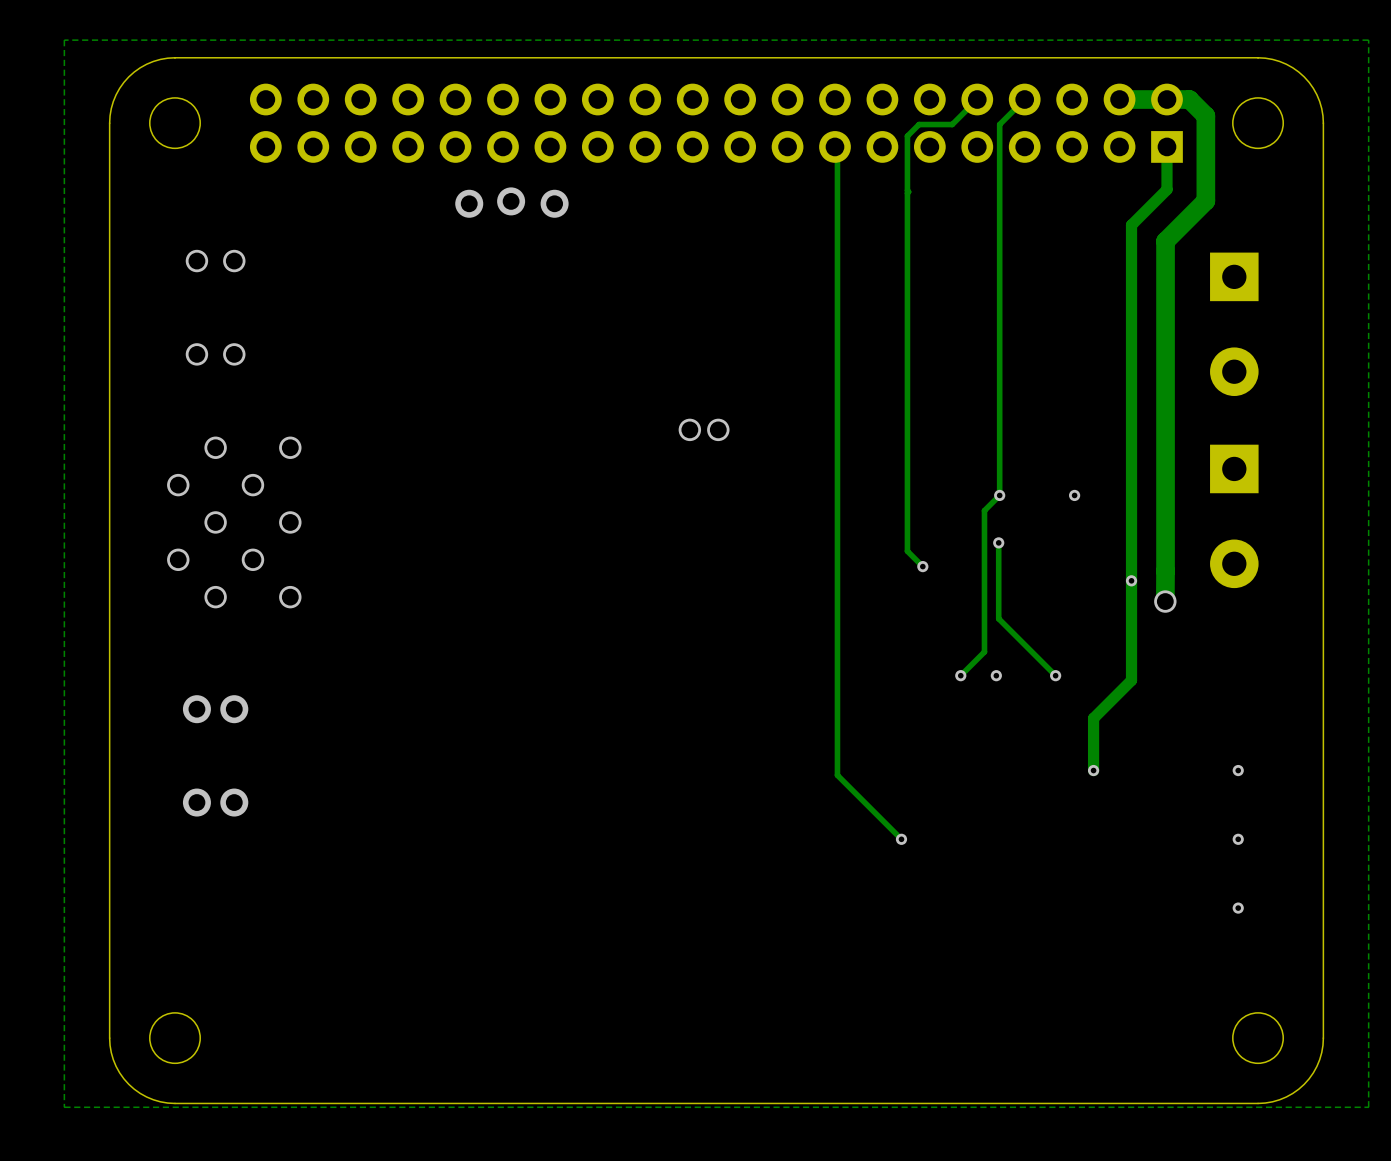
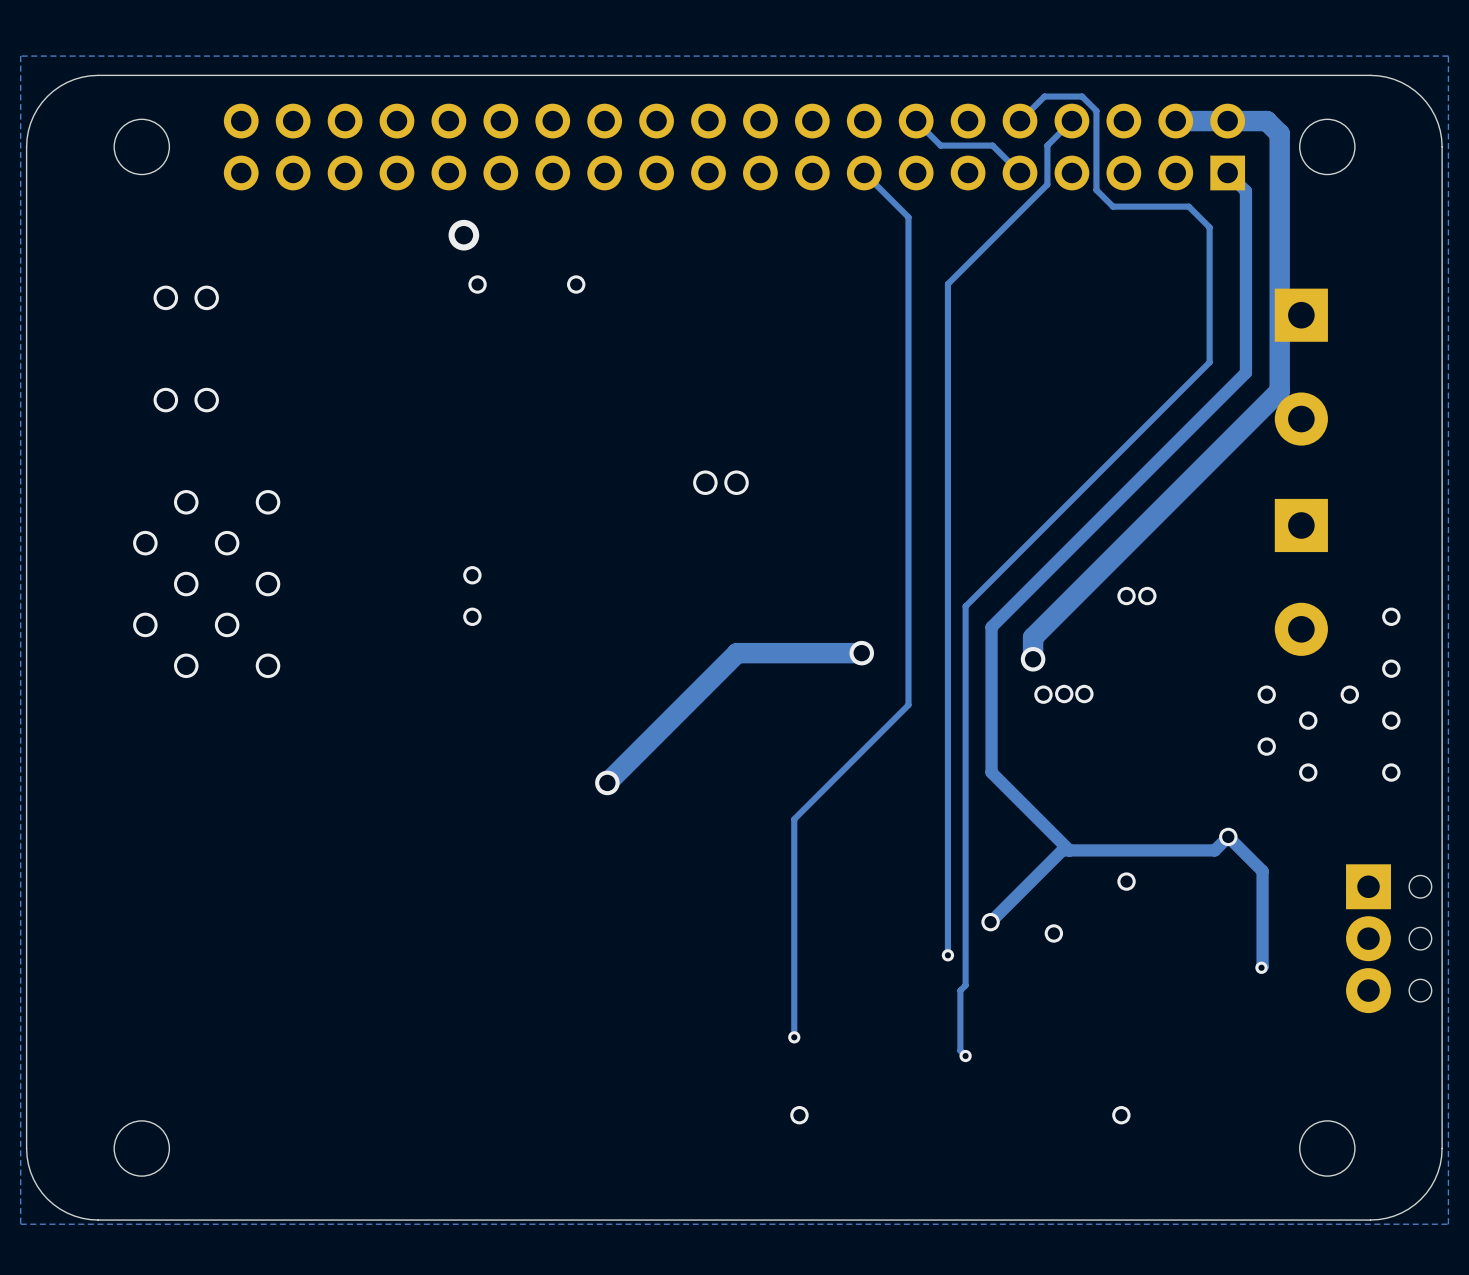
track: none -> (916, 121) (940, 145) (992, 145) (1020, 172)
track: (977, 99) (952, 124) (919, 124) (907, 136) (907, 551) (922, 566) -> (1020, 121) (1044, 96) (1082, 96) (1096, 110) (1096, 190) (1113, 206) (1188, 206) (1209, 227) (1209, 362) (965, 606) (965, 985) (960, 990) (960, 1050) (965, 1056)
track: (1189, 99) (1205, 115) (1205, 200) (1165, 241) (1165, 601) -> (1252, 121) (1266, 121) (1279, 133) (1279, 390) (1033, 637) (1033, 659)
track: (1002, 121) (999, 124) (999, 495) (984, 510) (984, 651) (960, 675) -> (1047, 145) (1047, 184) (947, 284) (947, 955)
board edge: (1323, 123) (1321, 108) (1316, 94) (1304, 76) (1286, 64) (1272, 59) (1258, 57) (175, 57) (153, 61) (134, 72) (123, 82) (116, 94) (111, 108) (109, 123) (109, 1038) (111, 1052) (116, 1066) (128, 1084) (146, 1096) (160, 1101) (175, 1103) -> (1327, 1220) (1378, 1219) (1394, 1216) (1408, 1209) (1421, 1199) (1431, 1186) (1438, 1172) (1441, 1156) (1442, 146) (1440, 131) (1435, 115) (1421, 96) (1401, 82) (1386, 77) (1370, 75) (98, 75) (74, 79) (60, 86) (47, 96) (33, 115) (27, 138) (26, 1148) (30, 1172) (37, 1186) (47, 1199) (60, 1209) (74, 1216) (90, 1219) (141, 1220)
board edge: (1323, 123) (1322, 1045) (1316, 1066) (1309, 1078) (1298, 1089) (1279, 1099) (1258, 1103) -> none
track: (1166, 146) (1166, 189) (1131, 225) (1131, 680) (1093, 718) (1093, 770) -> (1227, 172) (1245, 191) (1245, 372) (991, 627) (991, 772) (1069, 850)
track: (837, 149) (837, 775) (901, 839) (899, 839) -> (866, 175) (908, 217) (908, 705) (794, 819) (794, 1037)
via: (511, 201) -> none
via: (554, 203) -> none
via: none -> (477, 284)
via: none -> (576, 284)
via: (999, 495) -> none
via: (1074, 495) -> none
via: none -> (472, 575)
via: none -> (1126, 596)
via: none -> (1147, 596)
track: (998, 542) (998, 618) (1055, 675) -> none
via: (998, 542) -> none
via: none -> (472, 616)
via: none -> (1391, 616)
via: (922, 566) -> none
via: (1131, 580) -> none
track: none -> (861, 653) (737, 653) (607, 782)
via: none -> (861, 653)
via: none -> (1033, 659)
via: none -> (1391, 668)
via: (1165, 601) -> none
via: none -> (1064, 694)
via: none -> (1084, 694)
via: none -> (1043, 694)
via: none -> (1266, 694)
via: none -> (1349, 694)
via: none -> (1308, 720)
via: none -> (1391, 720)
via: none -> (1266, 746)
via: (960, 675) -> none
via: (996, 675) -> none
via: (1055, 675) -> none
via: none -> (1308, 772)
via: none -> (1391, 772)
via: none -> (607, 782)
via: (196, 709) -> none
via: (234, 709) -> none
via: none -> (1228, 836)
via: (1093, 770) -> none
via: (1238, 770) -> none
via: none -> (1126, 881)
via: (196, 802) -> none
via: (234, 802) -> none
track: none -> (990, 922) (1062, 850) (1214, 850) (1228, 836) (1262, 871) (1261, 967)
via: none -> (990, 922)
via position: (901, 839) -> (947, 955)
via: (1238, 839) -> none
via: none -> (1053, 933)
part: none -> (1388, 938)
via: none -> (1261, 967)
via: (1238, 908) -> none
via: none -> (794, 1037)
via: none -> (965, 1056)
via: none -> (799, 1115)
via: none -> (1121, 1115)

